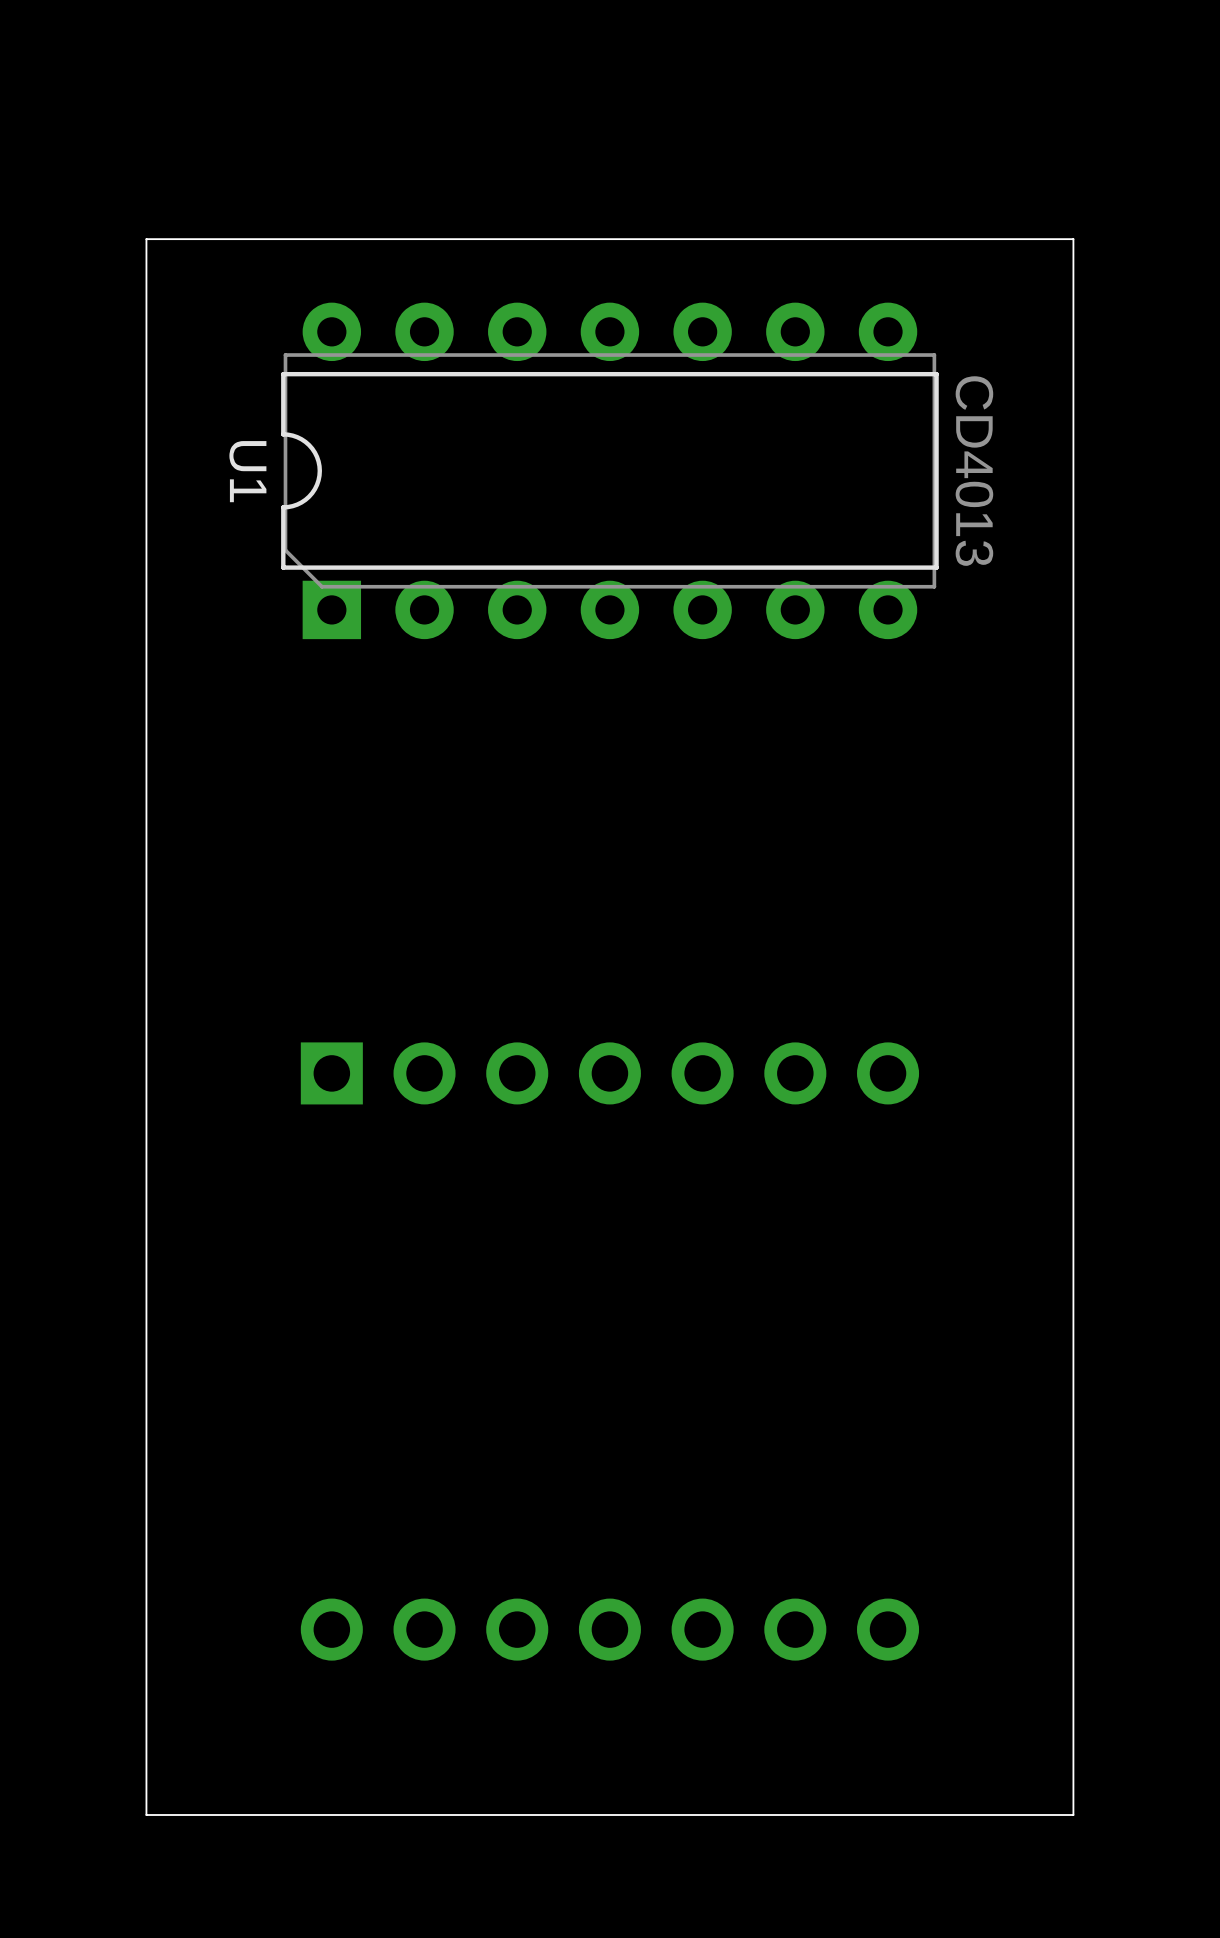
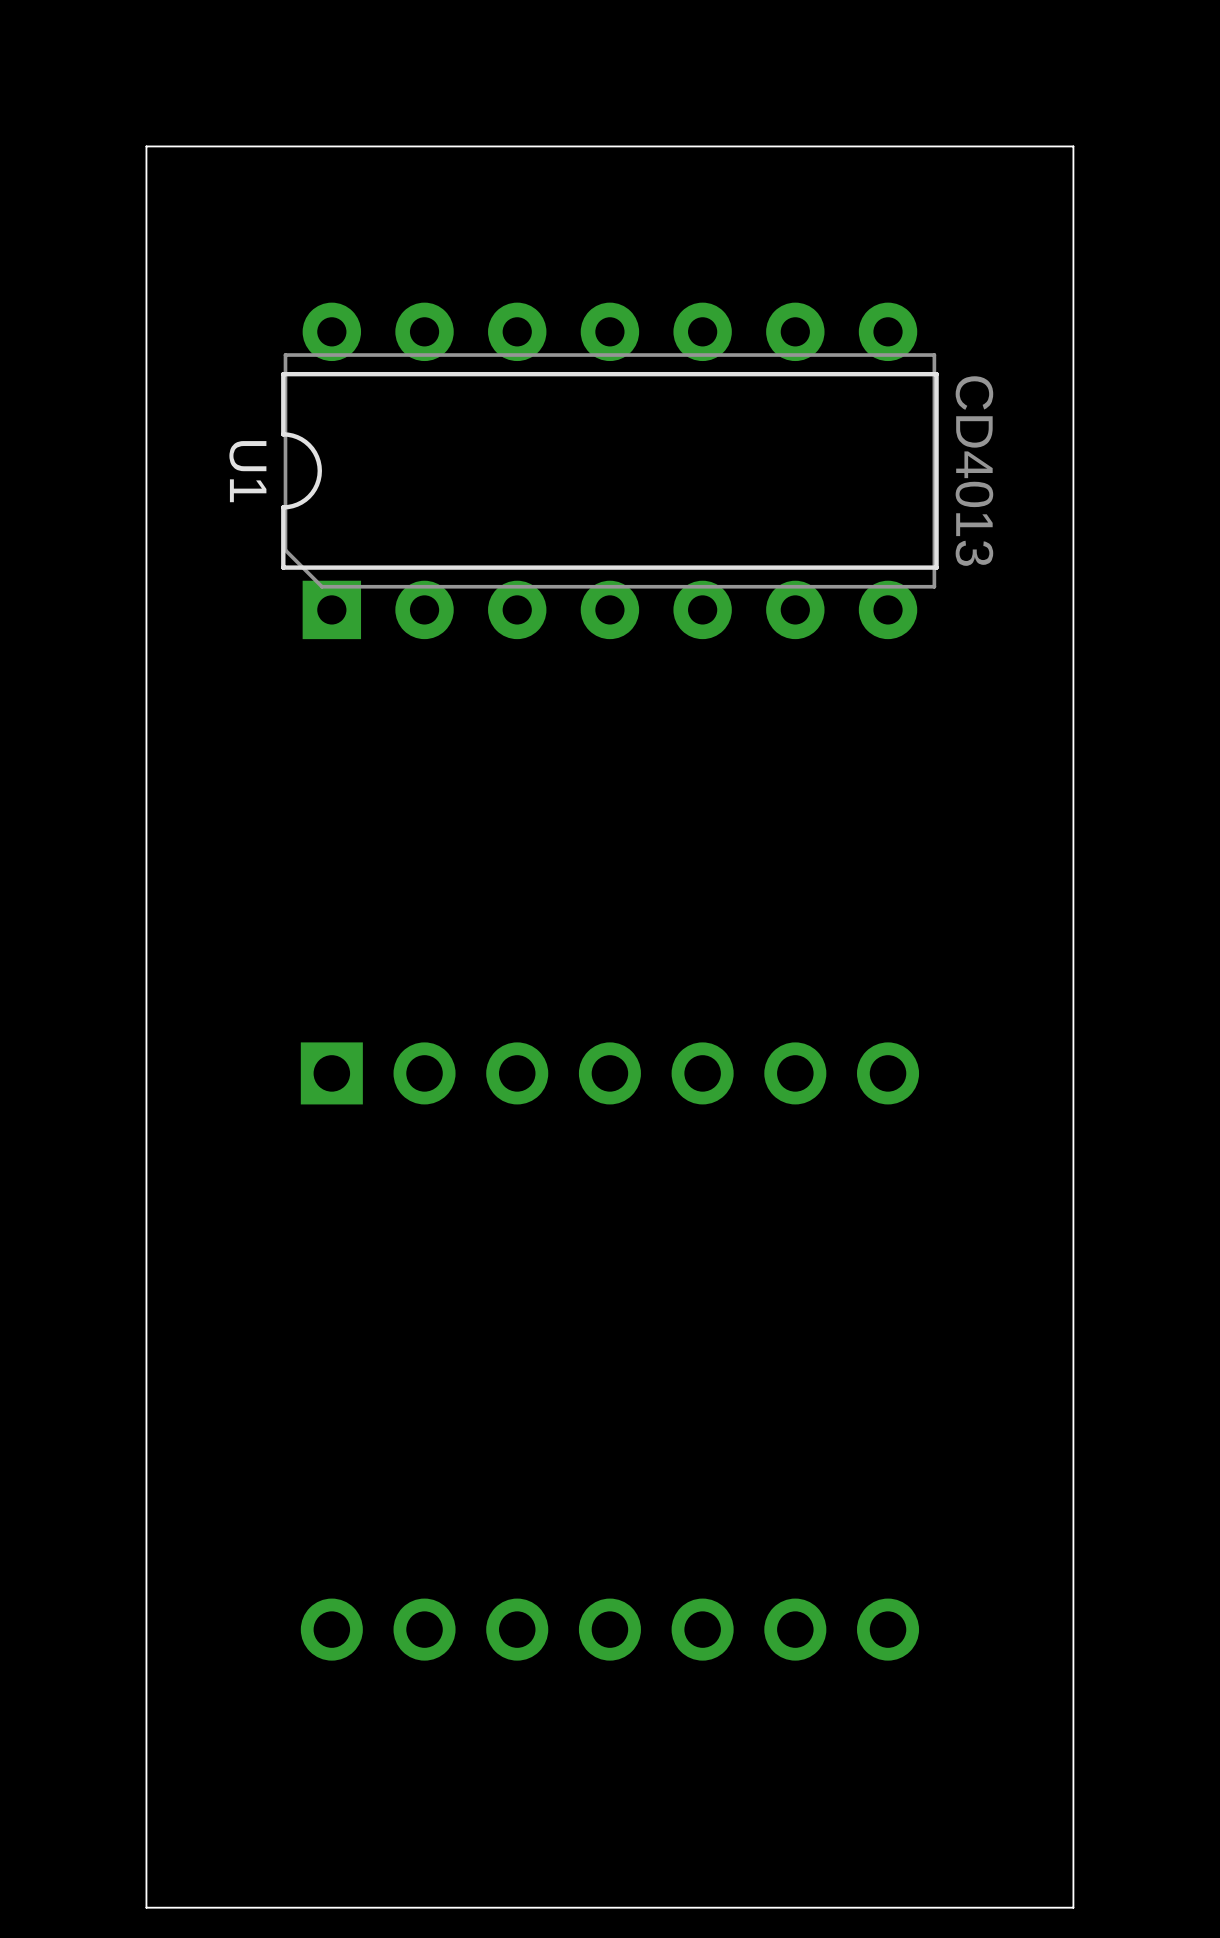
board edge: (1073, 239) (146, 239) -> (1073, 239) (1073, 146) (146, 146) (146, 239)
board edge: (1073, 1815) (146, 1815) -> (1073, 1815) (1073, 1907) (146, 1907) (146, 1815)

